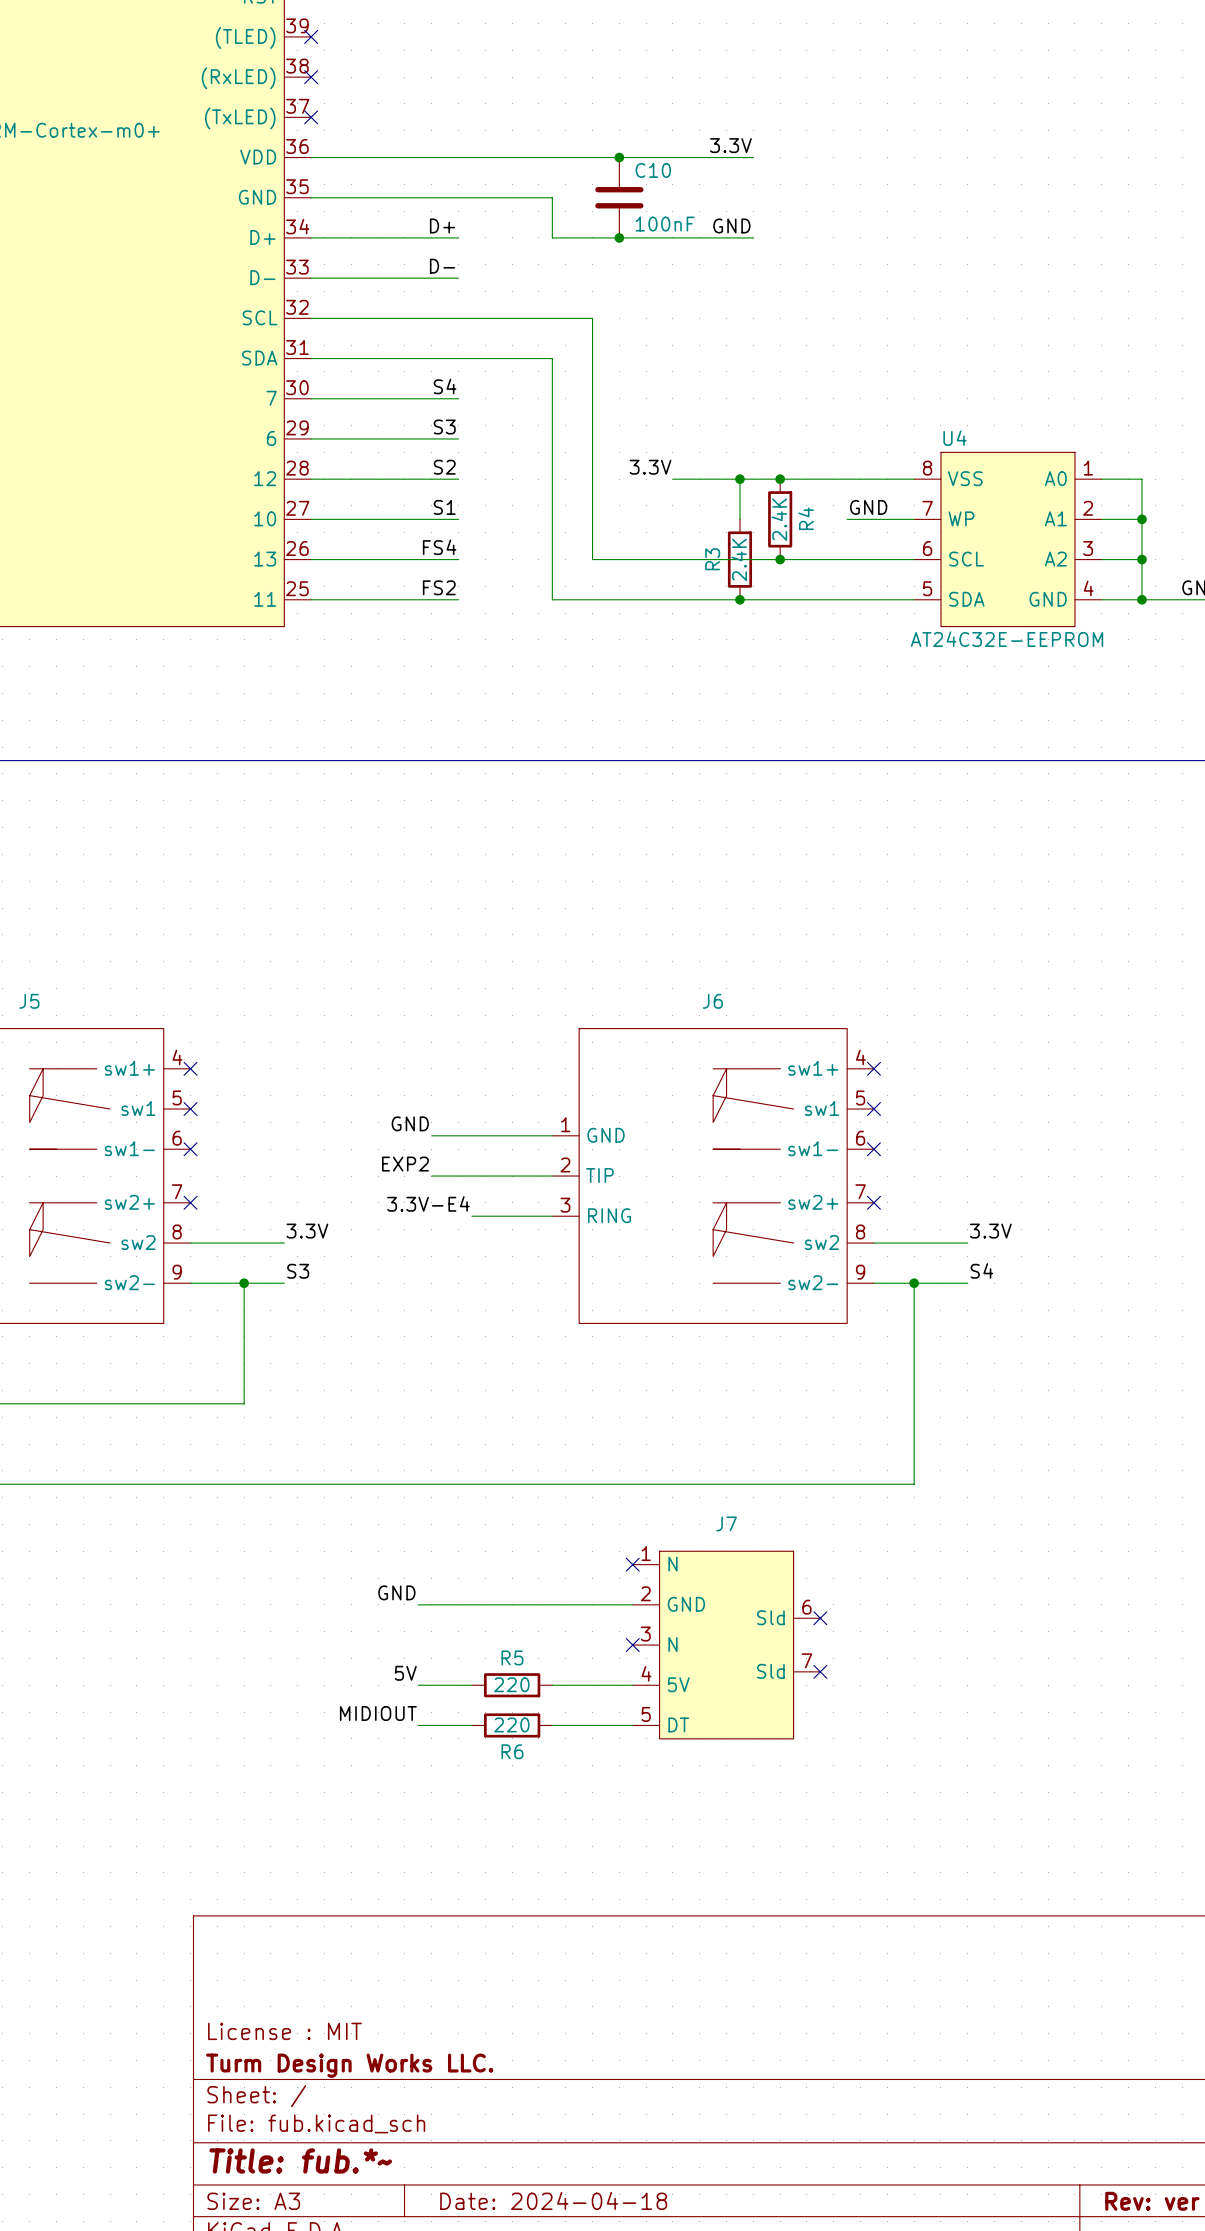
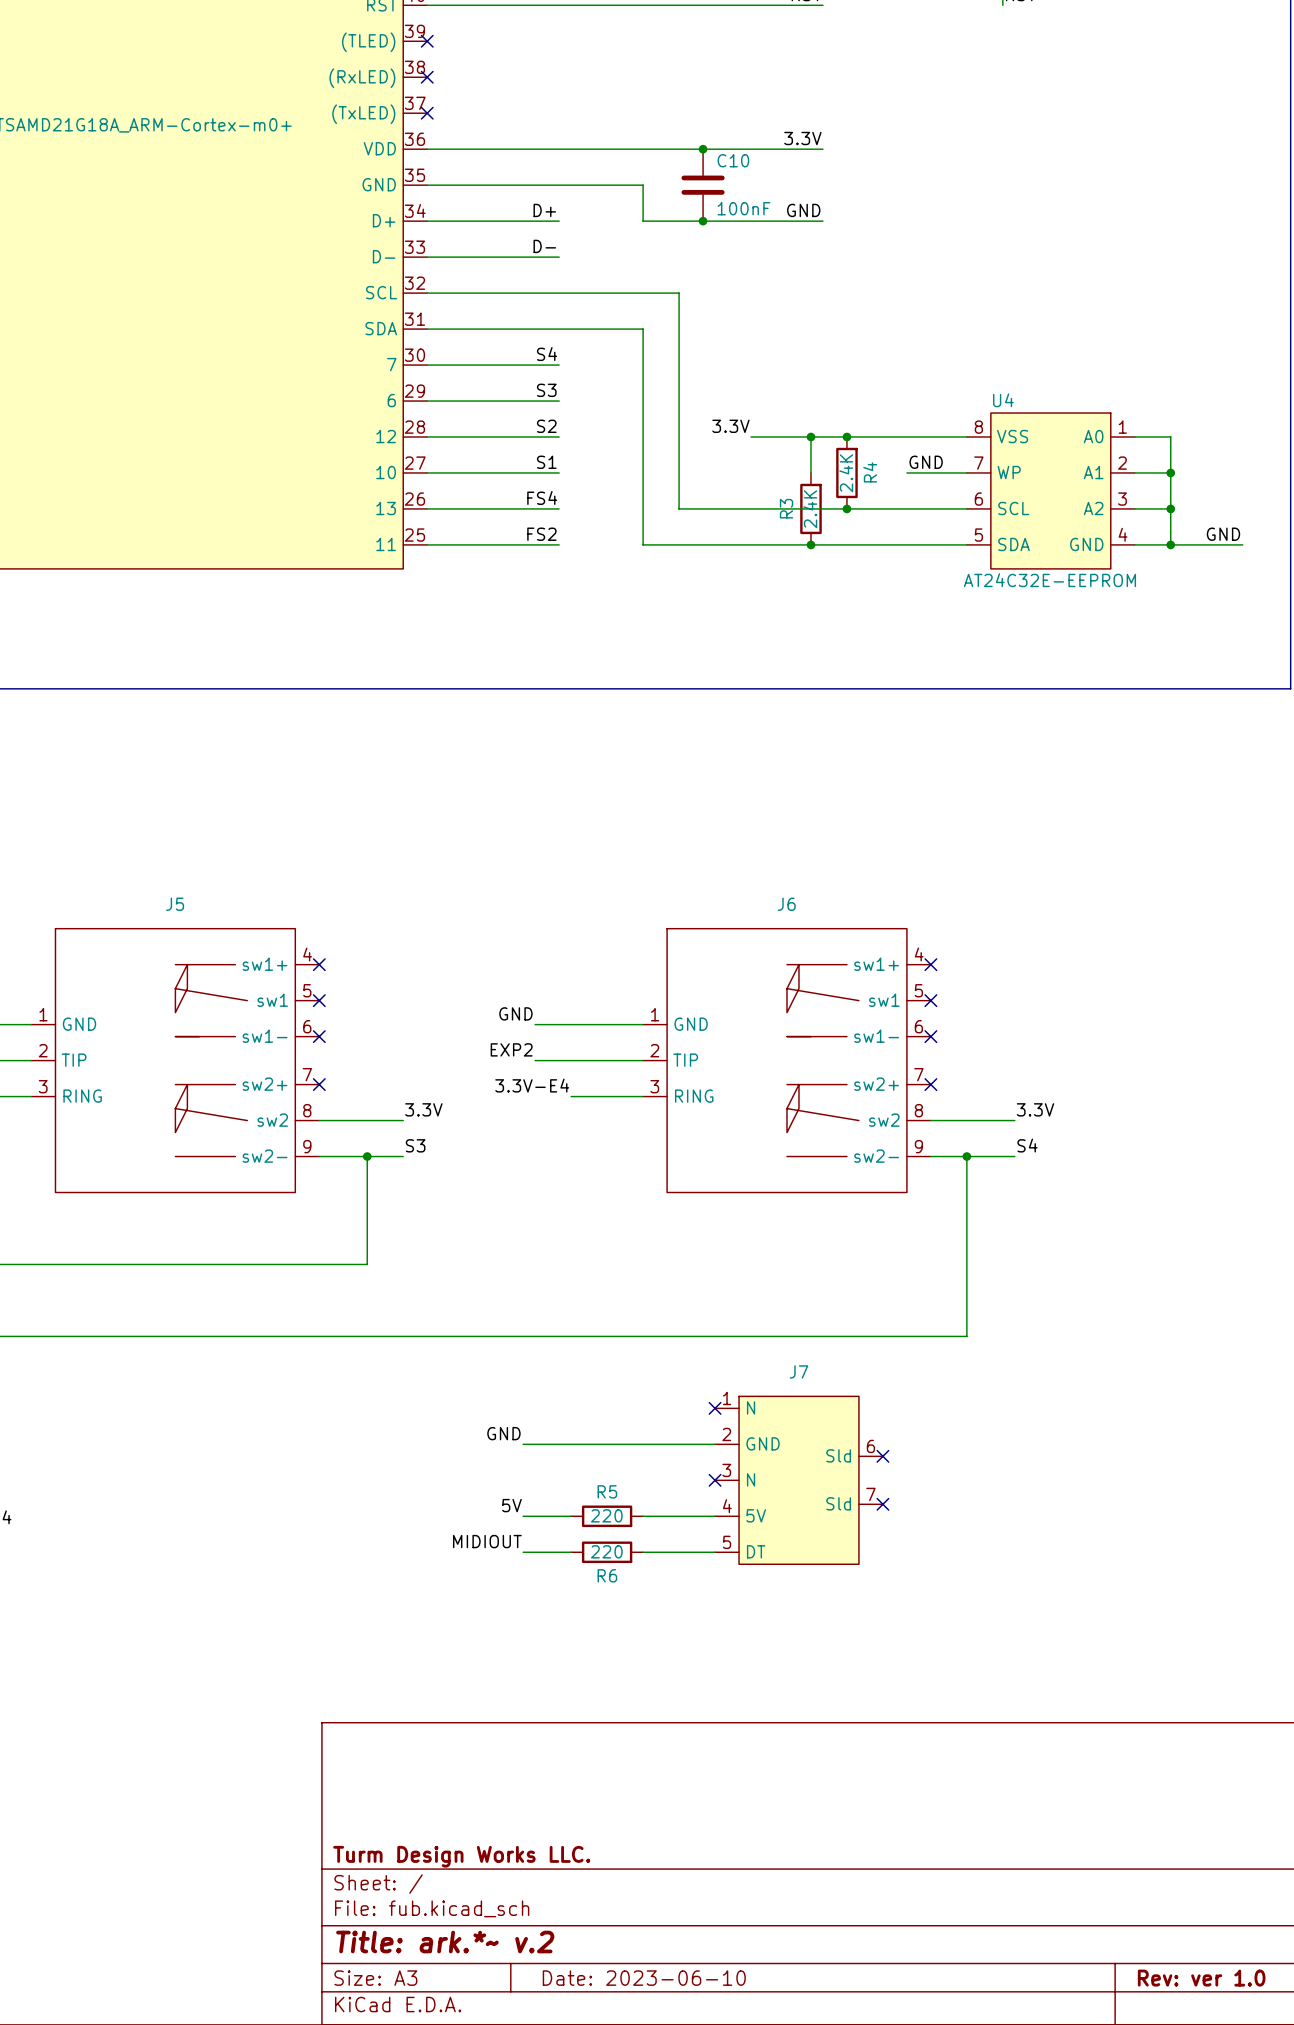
title block: License : MIT (284, 2031) -> none
title block: Title: fub.*~ (300, 2160) -> Title: ark.*~ v.2 (445, 1942)
title block: Date: 2024-04-18 (553, 2200) -> Date: 2023-06-10 (644, 1978)

